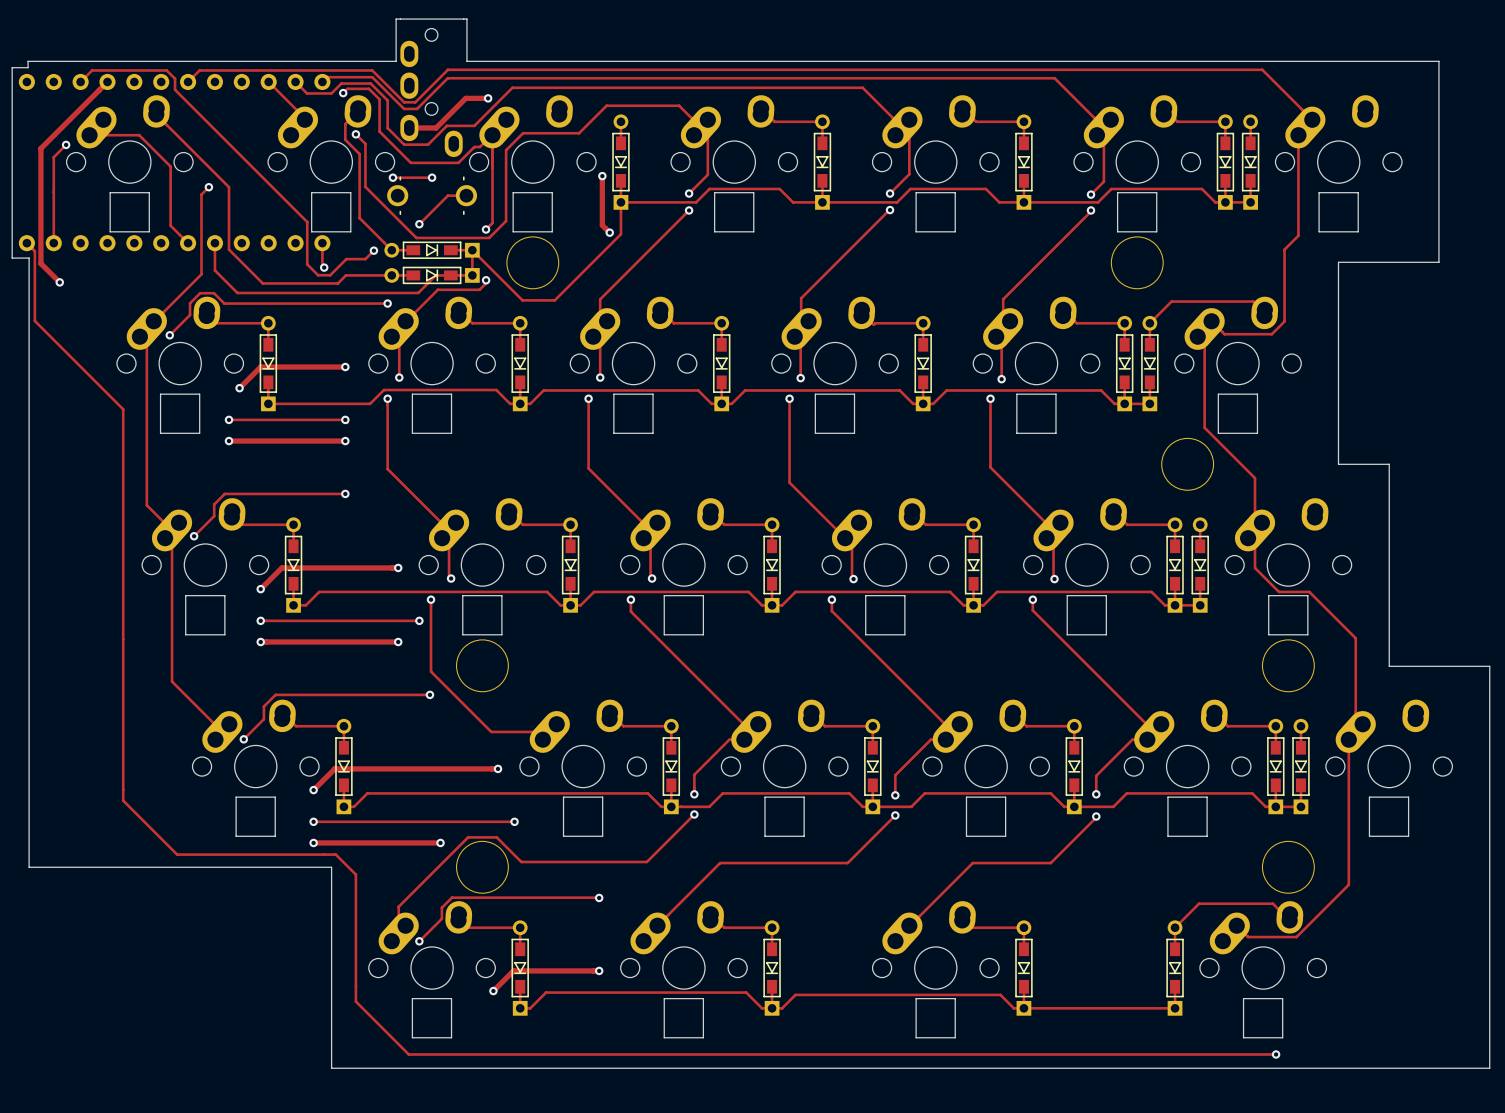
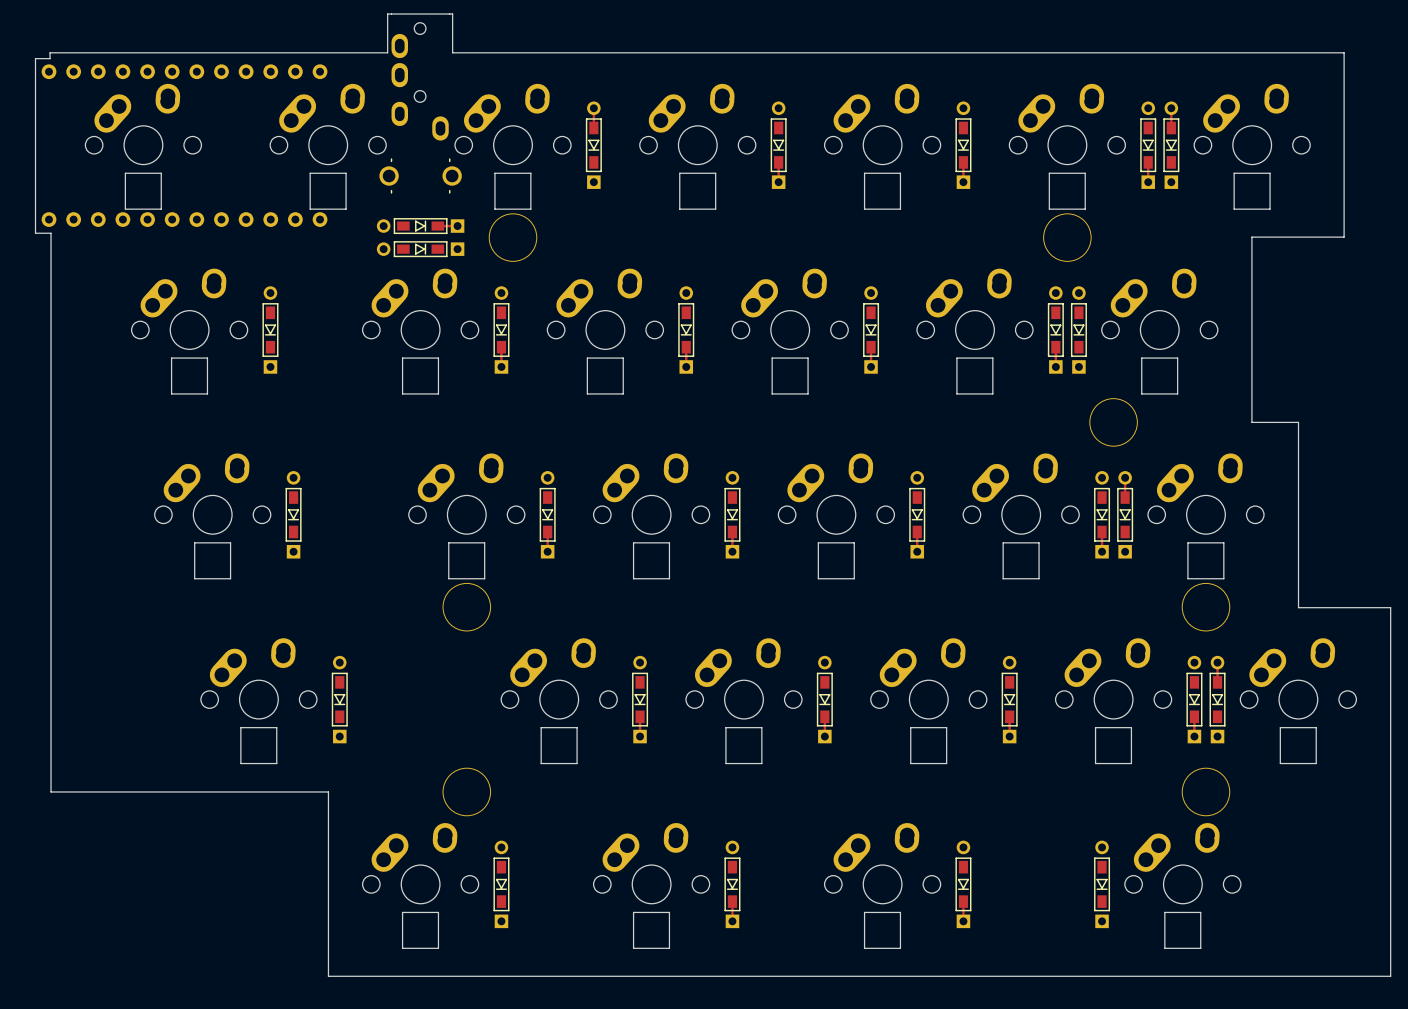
track: (80, 81) (92, 70) (166, 70) (175, 78) (175, 89) (307, 222) (307, 264) (318, 275) (330, 275) (346, 259) (365, 259) (373, 250) -> none
track: (107, 81) (40, 148) (40, 263) (59, 282) -> none
track: (188, 81) (199, 70) (372, 70) (404, 102) (415, 102) (447, 69) (1262, 69) (1312, 119) -> none
track: (268, 81) (304, 119) -> none
track: (295, 81) (307, 93) (331, 93) (341, 83) (370, 83) (387, 100) (387, 128) (404, 144) (428, 144) (446, 125) (474, 125) (512, 87) (862, 87) (910, 135) -> none
track: (322, 81) (327, 77) (372, 77) (404, 108) (417, 108) (447, 78) (1054, 78) (1103, 127) (1103, 181) (1090, 194) -> none
track: (343, 93) (347, 88) (368, 88) (379, 99) (379, 131) (410, 162) (458, 162) (474, 147) (479, 147) (499, 127) -> none
via: (343, 93) -> none
track: (488, 98) (465, 98) (436, 127) (409, 127) -> none
via: (488, 98) -> none
track: (761, 108) (774, 121) (822, 121) (822, 143) -> none
track: (962, 108) (976, 121) (1023, 121) (1023, 143) -> none
track: (1164, 108) (1177, 121) (1225, 121) (1225, 143) -> none
track: (357, 111) (345, 124) (345, 139) (359, 154) (359, 218) (391, 250) (413, 250) -> none
track: (156, 114) (229, 187) (229, 249) (262, 283) (337, 283) (345, 275) (413, 275) -> none
track: (707, 119) (707, 174) (689, 193) -> none
track: (909, 119) (909, 174) (890, 193) -> none
track: (700, 127) (679, 105) (606, 105) (579, 133) (523, 133) (506, 150) (506, 221) (489, 237) (416, 237) (365, 186) (365, 143) (355, 134) -> none
via: (355, 134) -> none
track: (89, 135) (139, 135) (170, 166) (170, 225) (188, 243) -> none
track: (492, 135) (492, 223) (486, 229) -> none
track: (1298, 135) (1298, 235) (1284, 249) (1284, 321) (1271, 334) (1224, 334) (1211, 321) -> none
track: (66, 144) (53, 157) (53, 243) -> none
via: (66, 144) -> none
track: (602, 176) (602, 225) (609, 232) -> none
via: (602, 176) -> none
track: (392, 177) (432, 177) -> none
via: (392, 177) -> none
via: (432, 177) -> none
track: (620, 180) (620, 234) (554, 300) (522, 300) (472, 250) (472, 275) (435, 275) (418, 292) (237, 292) (214, 270) (214, 243) -> none
track: (1250, 180) (1250, 202) (1215, 202) (1201, 188) (1111, 188) (1098, 202) (999, 202) (985, 188) (910, 188) (897, 202) (793, 202) (779, 188) (709, 188) (696, 202) (620, 202) -> none
track: (208, 187) (201, 194) (201, 274) (146, 328) (146, 505) (172, 530) (172, 681) (222, 731) -> none
via: (208, 187) -> none
via: (689, 193) -> none
via: (890, 193) -> none
via: (1090, 194) -> none
track: (466, 202) (466, 195) (447, 195) (419, 224) -> none
track: (689, 210) (600, 299) (600, 377) -> none
via: (689, 210) -> none
track: (890, 210) (801, 298) (801, 313) (808, 321) -> none
via: (890, 210) -> none
track: (1090, 210) (1003, 299) (1003, 314) (1010, 321) -> none
via: (1090, 210) -> none
via: (419, 224) -> none
via: (486, 229) -> none
via: (609, 232) -> none
track: (26, 243) (34, 251) (34, 320) (123, 409) (123, 800) (177, 854) (335, 854) (355, 874) (355, 1001) (408, 1054) (1276, 1054) -> none
track: (322, 243) (322, 265) (324, 267) -> none
via: (373, 250) -> none
via: (324, 267) -> none
track: (486, 280) (486, 283) (479, 289) (437, 289) (398, 328) (399, 377) -> none
via: (486, 280) -> none
via: (59, 282) -> none
track: (387, 303) (224, 303) (214, 293) (200, 293) (190, 303) (190, 315) (169, 335) -> none
via: (387, 303) -> none
track: (458, 309) (472, 323) (520, 323) (520, 344) -> none
track: (660, 309) (673, 323) (721, 323) (721, 344) -> none
track: (1063, 309) (1076, 323) (1124, 323) (1124, 344) -> none
track: (861, 312) (873, 324) (923, 323) (923, 344) -> none
track: (1264, 312) (1253, 301) (1171, 301) (1149, 323) (1149, 344) -> none
track: (206, 315) (213, 323) (268, 323) (267, 345) -> none
track: (801, 328) (800, 378) -> none
track: (1003, 328) (1001, 379) -> none
track: (1204, 328) (1204, 427) (1255, 478) (1255, 567) (1278, 591) (1309, 591) (1355, 638) (1355, 731) -> none
via: (169, 335) -> none
track: (345, 367) (260, 367) (239, 388) -> none
via: (345, 367) -> none
via: (399, 377) -> none
via: (600, 377) -> none
via: (800, 378) -> none
via: (1001, 379) -> none
track: (268, 382) (268, 403) (370, 403) (383, 390) (496, 390) (510, 403) (530, 403) (543, 390) (698, 390) (711, 403) (731, 403) (745, 390) (899, 390) (913, 403) (933, 403) (946, 390) (1101, 390) (1114, 403) (1149, 403) (1149, 382) -> none
via: (239, 388) -> none
track: (387, 398) (387, 469) (449, 530) (449, 576) (451, 578) -> none
via: (387, 398) -> none
track: (588, 398) (588, 468) (650, 530) (652, 578) -> none
via: (588, 398) -> none
track: (789, 398) (789, 482) (845, 538) -> none
via: (789, 398) -> none
track: (990, 398) (990, 467) (1053, 530) (1054, 579) -> none
via: (990, 398) -> none
track: (229, 419) (345, 419) -> none
via: (229, 419) -> none
via: (345, 419) -> none
track: (229, 441) (345, 441) -> none
via: (229, 441) -> none
via: (345, 441) -> none
track: (345, 493) (224, 493) (214, 504) (214, 516) (194, 536) -> none
via: (345, 493) -> none
track: (509, 511) (522, 524) (570, 524) (570, 546) -> none
track: (710, 511) (724, 524) (772, 524) (772, 546) -> none
track: (912, 511) (925, 524) (973, 524) (973, 546) -> none
track: (1113, 511) (1127, 524) (1175, 524) (1175, 546) -> none
track: (232, 514) (242, 524) (293, 524) (294, 546) -> none
track: (852, 530) (853, 579) -> none
via: (194, 536) -> none
track: (398, 567) (281, 567) (260, 589) -> none
via: (398, 567) -> none
via: (451, 578) -> none
via: (652, 578) -> none
via: (853, 579) -> none
via: (1054, 579) -> none
track: (293, 583) (293, 605) (305, 605) (319, 591) (547, 591) (560, 605) (580, 605) (594, 591) (748, 591) (762, 605) (782, 605) (795, 591) (950, 591) (963, 605) (983, 605) (997, 591) (1151, 591) (1165, 605) (1200, 605) (1200, 583) -> none
via: (260, 589) -> none
track: (431, 599) (431, 671) (491, 731) (549, 731) -> none
via: (431, 599) -> none
track: (630, 599) (630, 611) (751, 731) -> none
via: (630, 599) -> none
track: (831, 599) (831, 611) (952, 731) -> none
via: (831, 599) -> none
track: (1032, 599) (1032, 610) (1154, 731) -> none
via: (1032, 599) -> none
track: (260, 620) (419, 620) -> none
via: (260, 620) -> none
via: (419, 620) -> none
track: (260, 642) (398, 642) -> none
via: (260, 642) -> none
via: (398, 642) -> none
track: (429, 694) (275, 694) (263, 706) (263, 719) (243, 739) -> none
via: (429, 694) -> none
track: (282, 712) (296, 726) (343, 726) (343, 747) -> none
track: (610, 712) (623, 726) (671, 726) (671, 747) -> none
track: (811, 712) (824, 726) (872, 726) (872, 747) -> none
track: (1013, 712) (1026, 726) (1074, 726) (1074, 747) -> none
track: (1214, 712) (1227, 726) (1275, 726) (1275, 747) -> none
via: (243, 739) -> none
track: (744, 739) (729, 739) (694, 774) (694, 794) -> none
track: (945, 739) (930, 739) (895, 775) (895, 795) -> none
track: (1147, 739) (1132, 739) (1096, 775) (1096, 794) -> none
track: (1348, 739) (1348, 884) (1296, 937) (1248, 937) (1236, 925) -> none
track: (498, 768) (334, 768) (313, 790) -> none
via: (498, 768) -> none
track: (343, 785) (343, 806) (353, 806) (367, 793) (647, 793) (661, 806) (681, 806) -> none
track: (1300, 785) (1300, 806) (1265, 806) (1252, 793) (1126, 793) (1113, 806) (1064, 806) (1050, 793) (924, 793) (911, 806) (862, 806) (849, 793) (722, 793) (709, 806) (681, 806) -> none
via: (313, 790) -> none
via: (694, 794) -> none
via: (1096, 794) -> none
via: (895, 795) -> none
track: (694, 814) (646, 862) (521, 862) (496, 837) (468, 837) (398, 906) (398, 933) -> none
via: (694, 814) -> none
track: (895, 815) (847, 863) (720, 863) (657, 925) -> none
via: (895, 815) -> none
track: (1096, 816) (1050, 863) (972, 863) (902, 933) -> none
via: (1096, 816) -> none
track: (313, 821) (514, 821) -> none
via: (313, 821) -> none
via: (514, 821) -> none
track: (313, 842) (440, 842) -> none
via: (313, 842) -> none
via: (440, 842) -> none
track: (599, 897) (452, 897) (441, 907) (441, 918) (419, 941) -> none
via: (599, 897) -> none
track: (710, 914) (724, 927) (772, 927) (772, 949) -> none
track: (458, 917) (469, 927) (520, 927) (520, 949) -> none
track: (962, 917) (972, 927) (1023, 927) (1023, 949) -> none
track: (1289, 920) (1272, 903) (1199, 903) (1175, 927) (1175, 949) -> none
via: (419, 941) -> none
track: (599, 970) (513, 970) (493, 991) -> none
via: (599, 970) -> none
track: (520, 986) (520, 1008) (530, 1008) (546, 992) (746, 992) (762, 1008) (782, 1008) (795, 994) (1000, 994) (1013, 1008) (1175, 1008) (1175, 986) -> none
via: (493, 991) -> none
via: (1276, 1054) -> none

